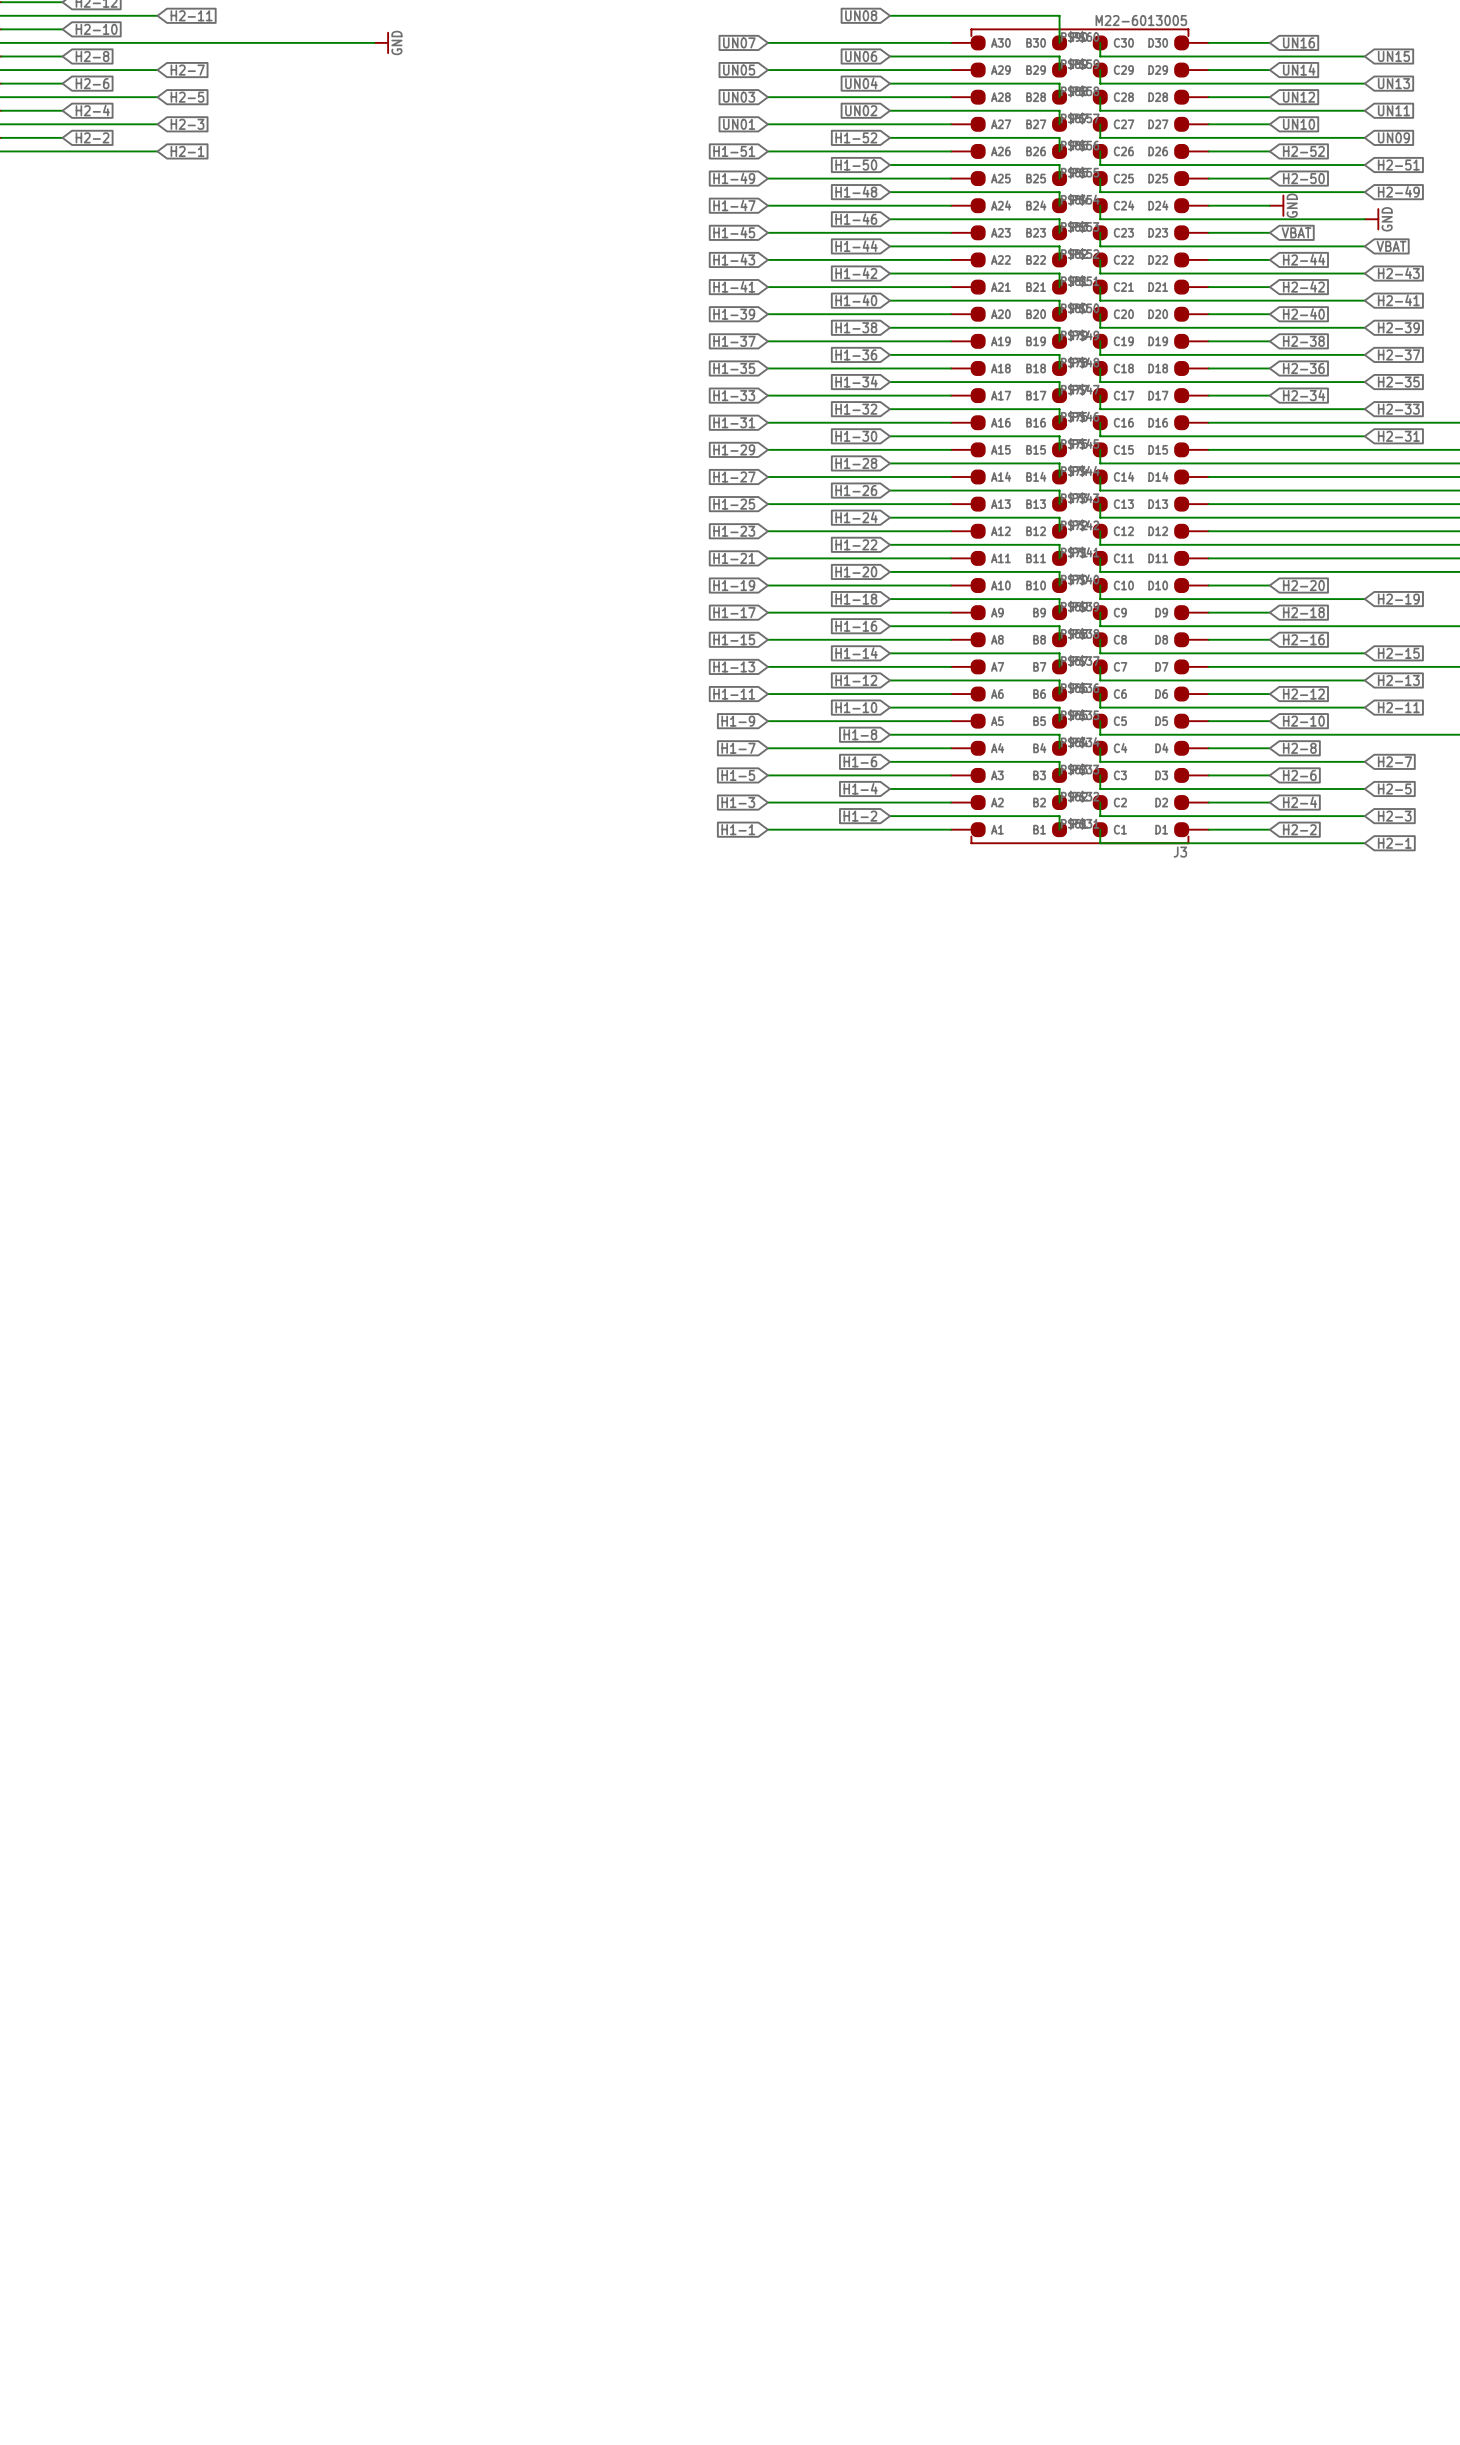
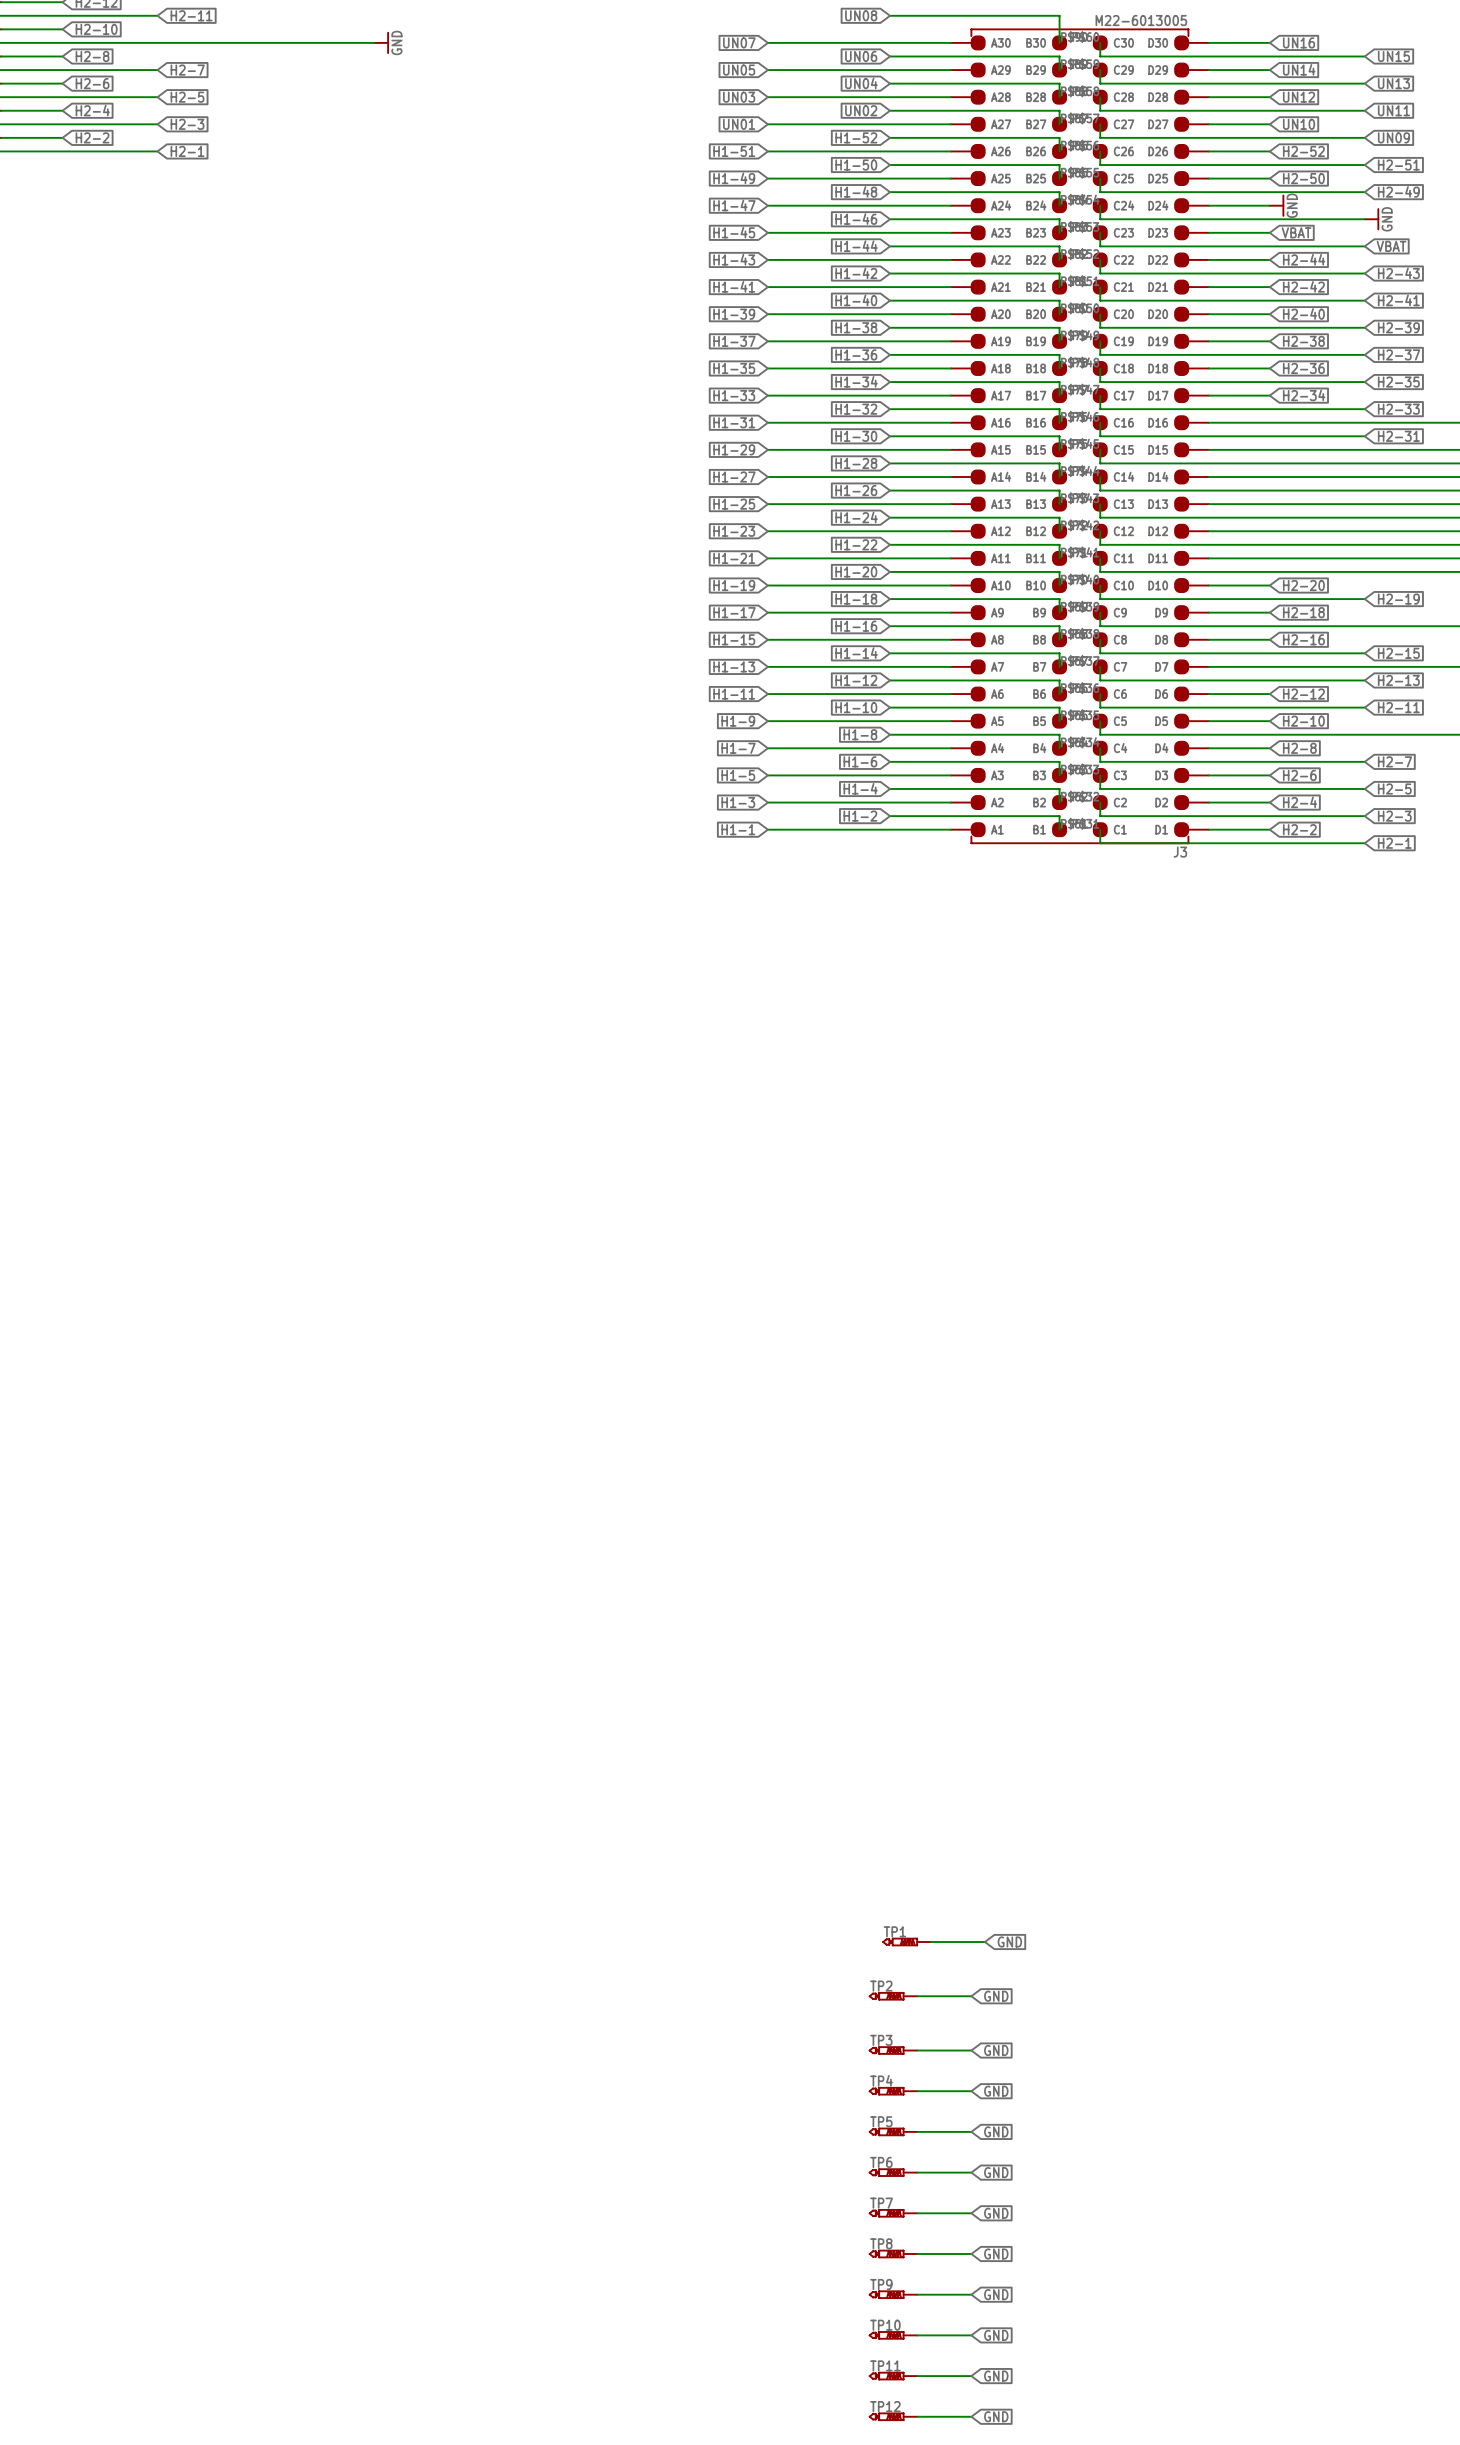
TP1: none -> (906, 1942)
wire: none -> (930, 1942) (984, 1942)
global label: none -> GND (1009, 1942)
TP2: none -> (893, 1996)
wire: none -> (917, 1996) (971, 1996)
global label: none -> GND (996, 1996)
TP3: none -> (893, 2050)
wire: none -> (917, 2050) (971, 2050)
global label: none -> GND (996, 2050)
TP4: none -> (893, 2091)
wire: none -> (917, 2091) (971, 2091)
global label: none -> GND (996, 2091)
TP5: none -> (893, 2131)
wire: none -> (917, 2131) (971, 2131)
global label: none -> GND (996, 2131)
TP6: none -> (893, 2172)
wire: none -> (917, 2172) (971, 2172)
global label: none -> GND (996, 2172)
TP7: none -> (893, 2213)
wire: none -> (917, 2213) (971, 2213)
global label: none -> GND (996, 2213)
TP8: none -> (893, 2253)
wire: none -> (917, 2253) (971, 2253)
global label: none -> GND (996, 2253)
TP9: none -> (893, 2294)
wire: none -> (917, 2294) (971, 2294)
global label: none -> GND (996, 2294)
TP10: none -> (893, 2335)
wire: none -> (917, 2335) (971, 2335)
global label: none -> GND (996, 2335)
TP11: none -> (893, 2376)
wire: none -> (917, 2376) (971, 2376)
global label: none -> GND (996, 2376)
TP12: none -> (893, 2416)
wire: none -> (917, 2416) (971, 2416)
global label: none -> GND (996, 2416)

